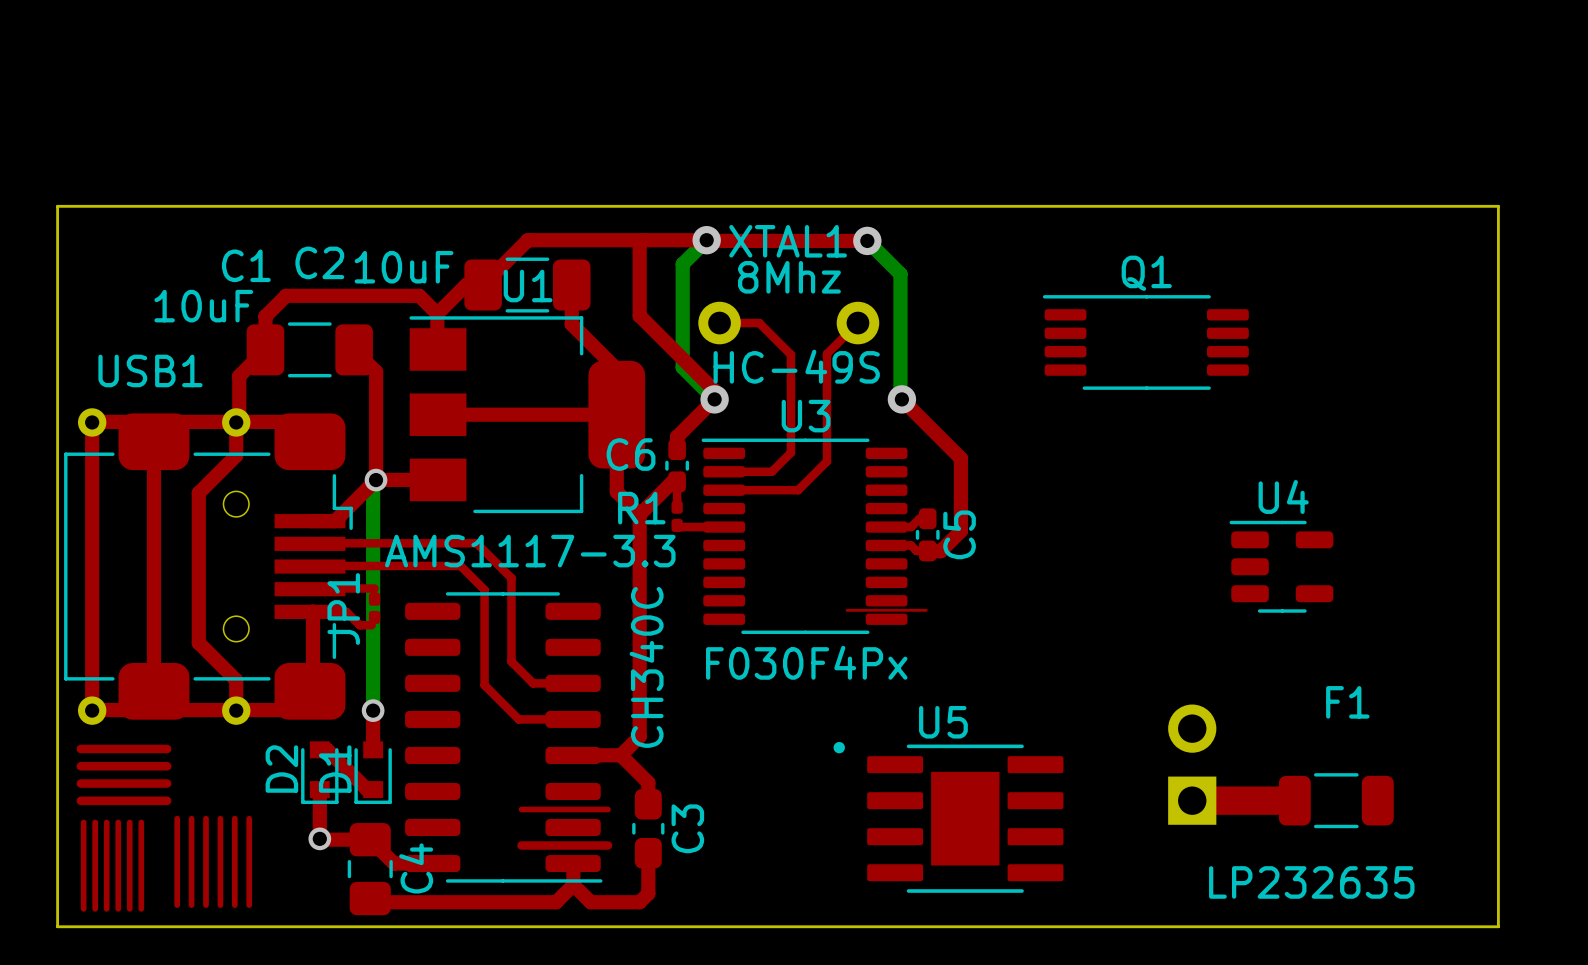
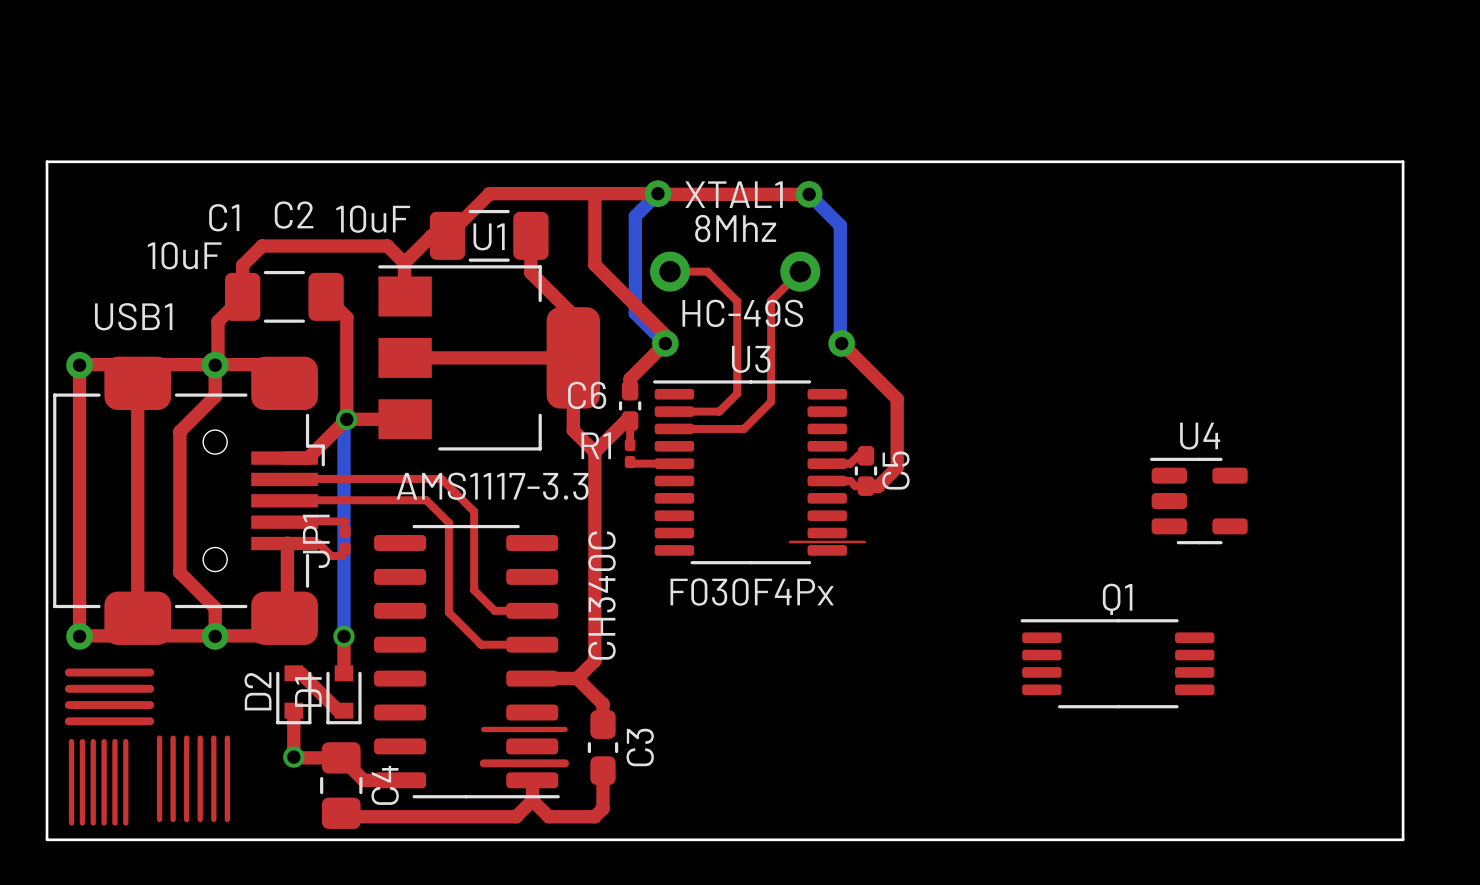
Q1 position: (1145, 342) -> (1117, 663)
part: LP232635 (1192, 764) -> none
top track: (1192, 800) (1294, 800) -> none
F1: (1336, 800) -> none
U5: (948, 817) -> none

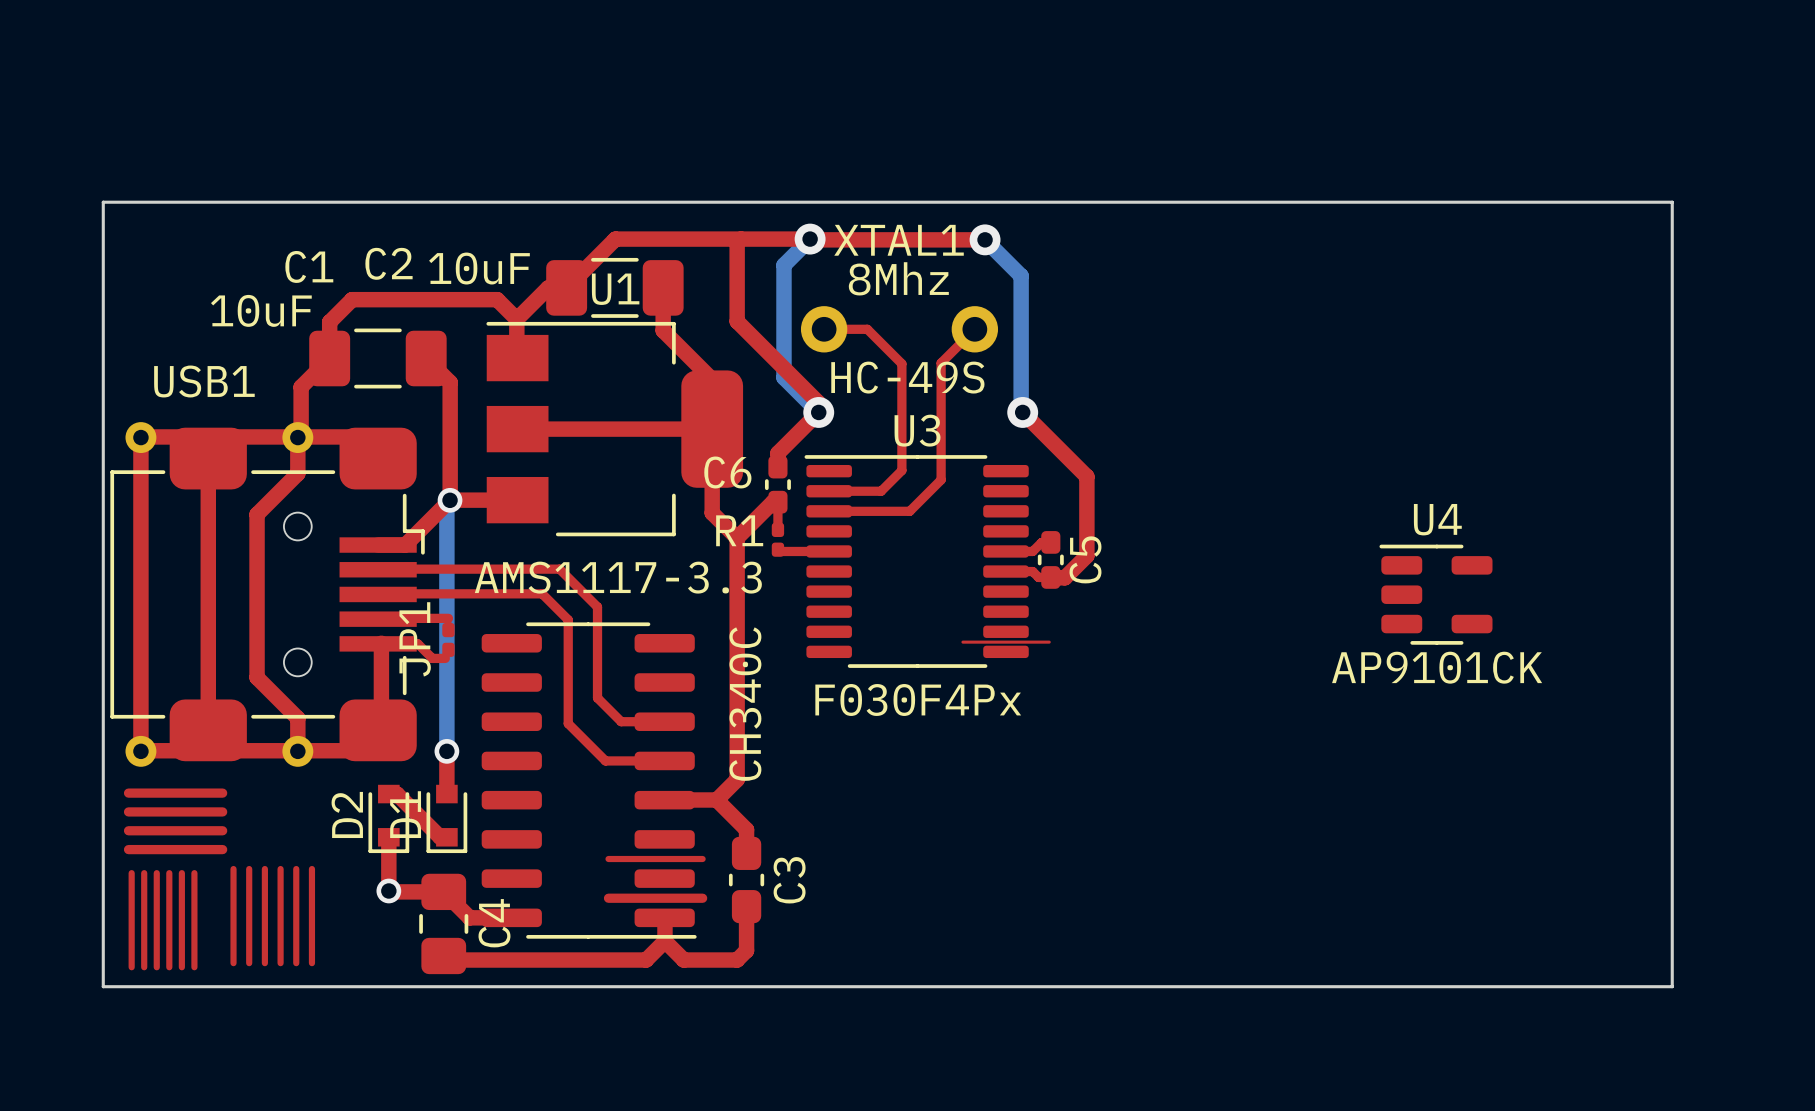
U4 value: none -> AP9101CK (1437, 667)
Q1: (1117, 663) -> none

